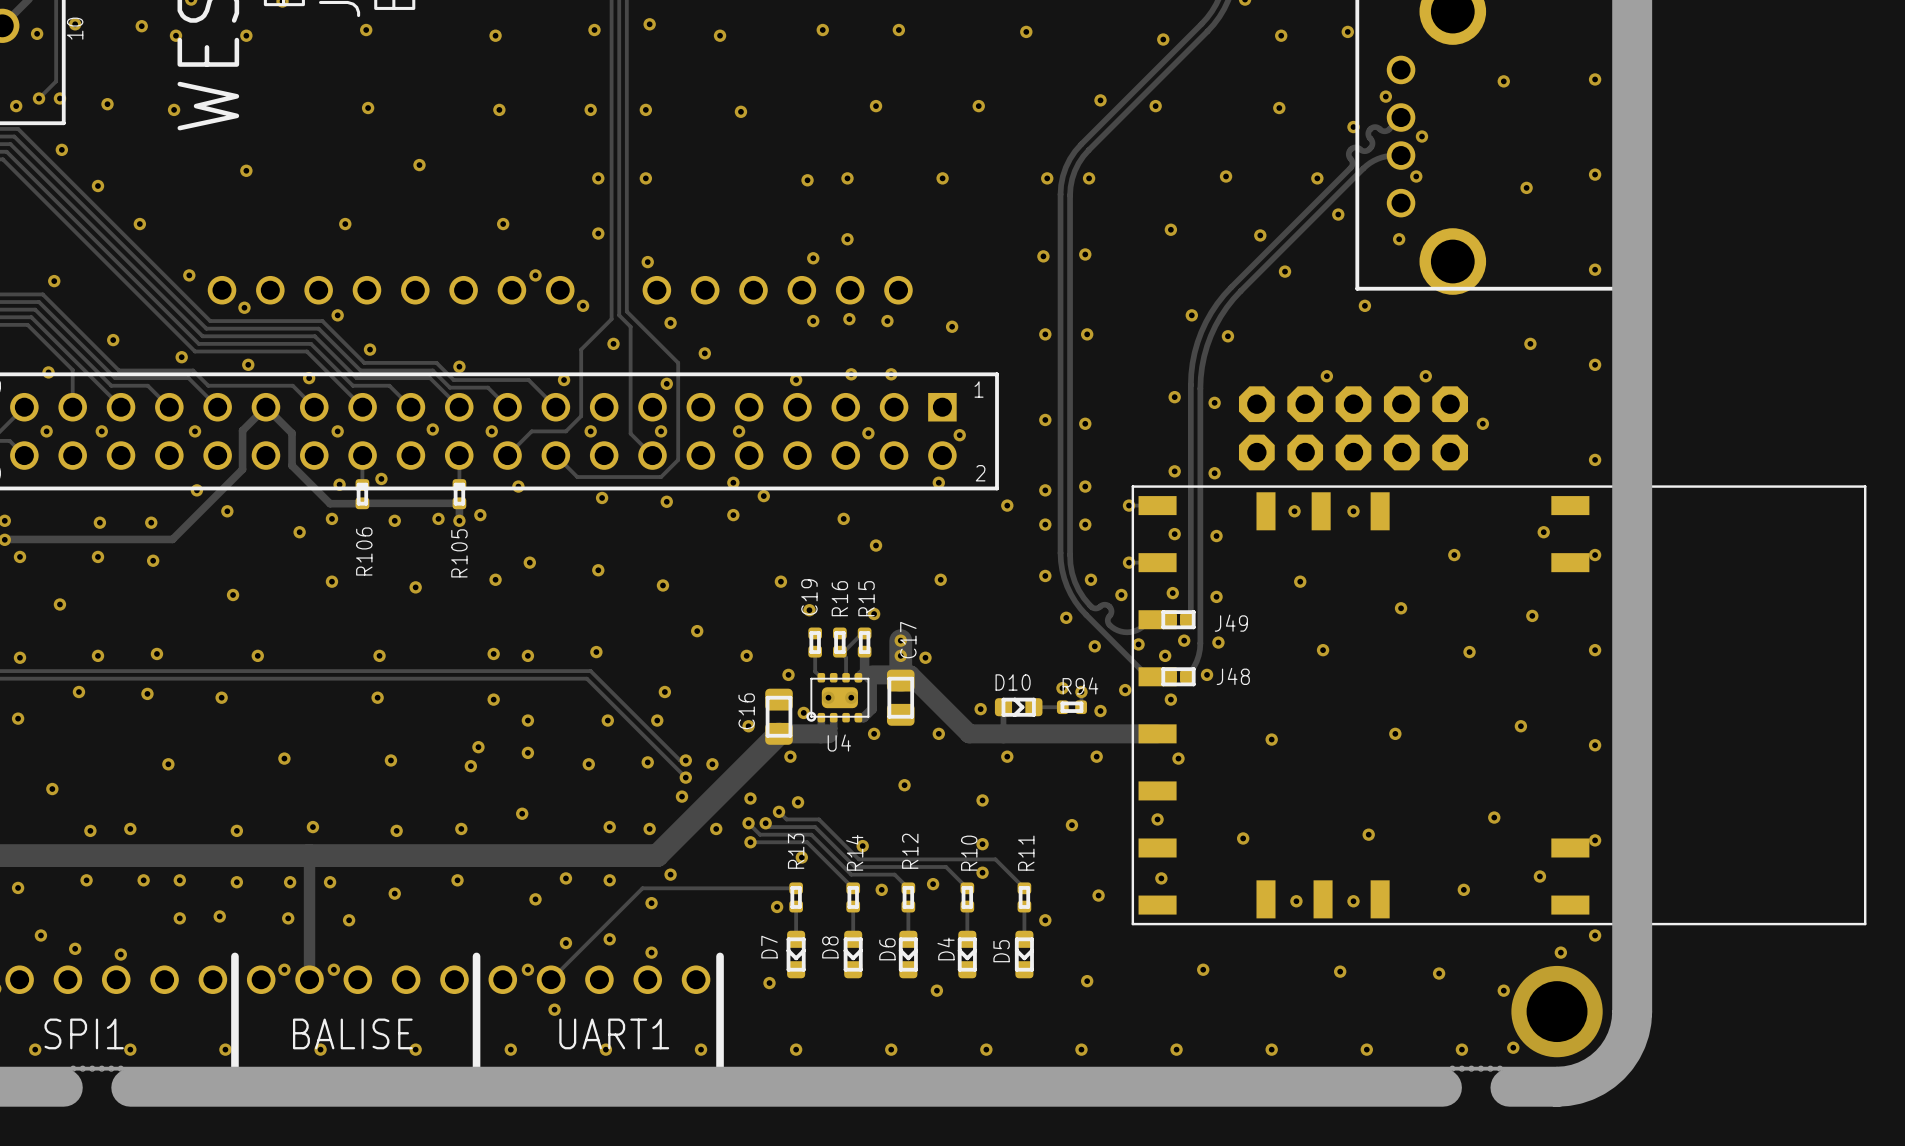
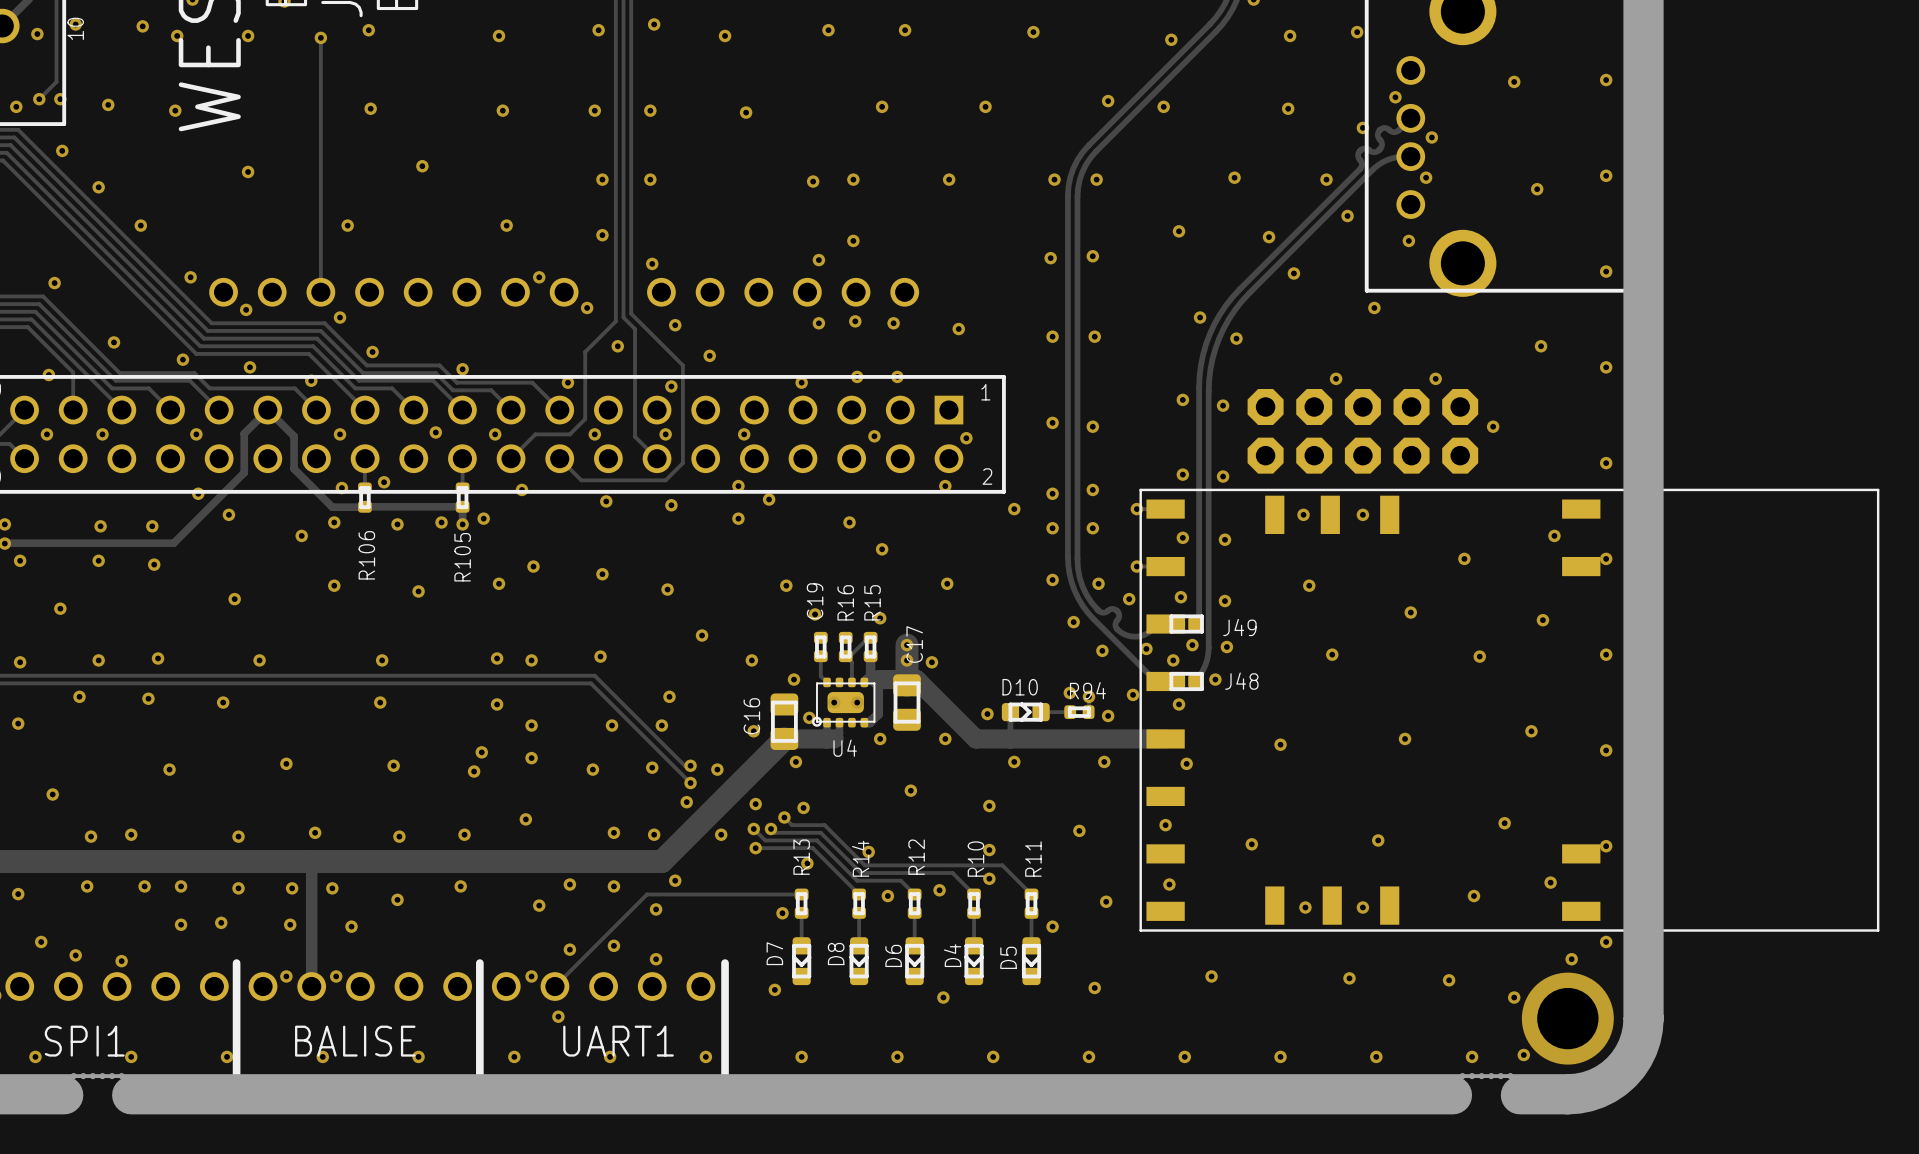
track: none -> (320, 37) (320, 292)
via: none -> (320, 37)

